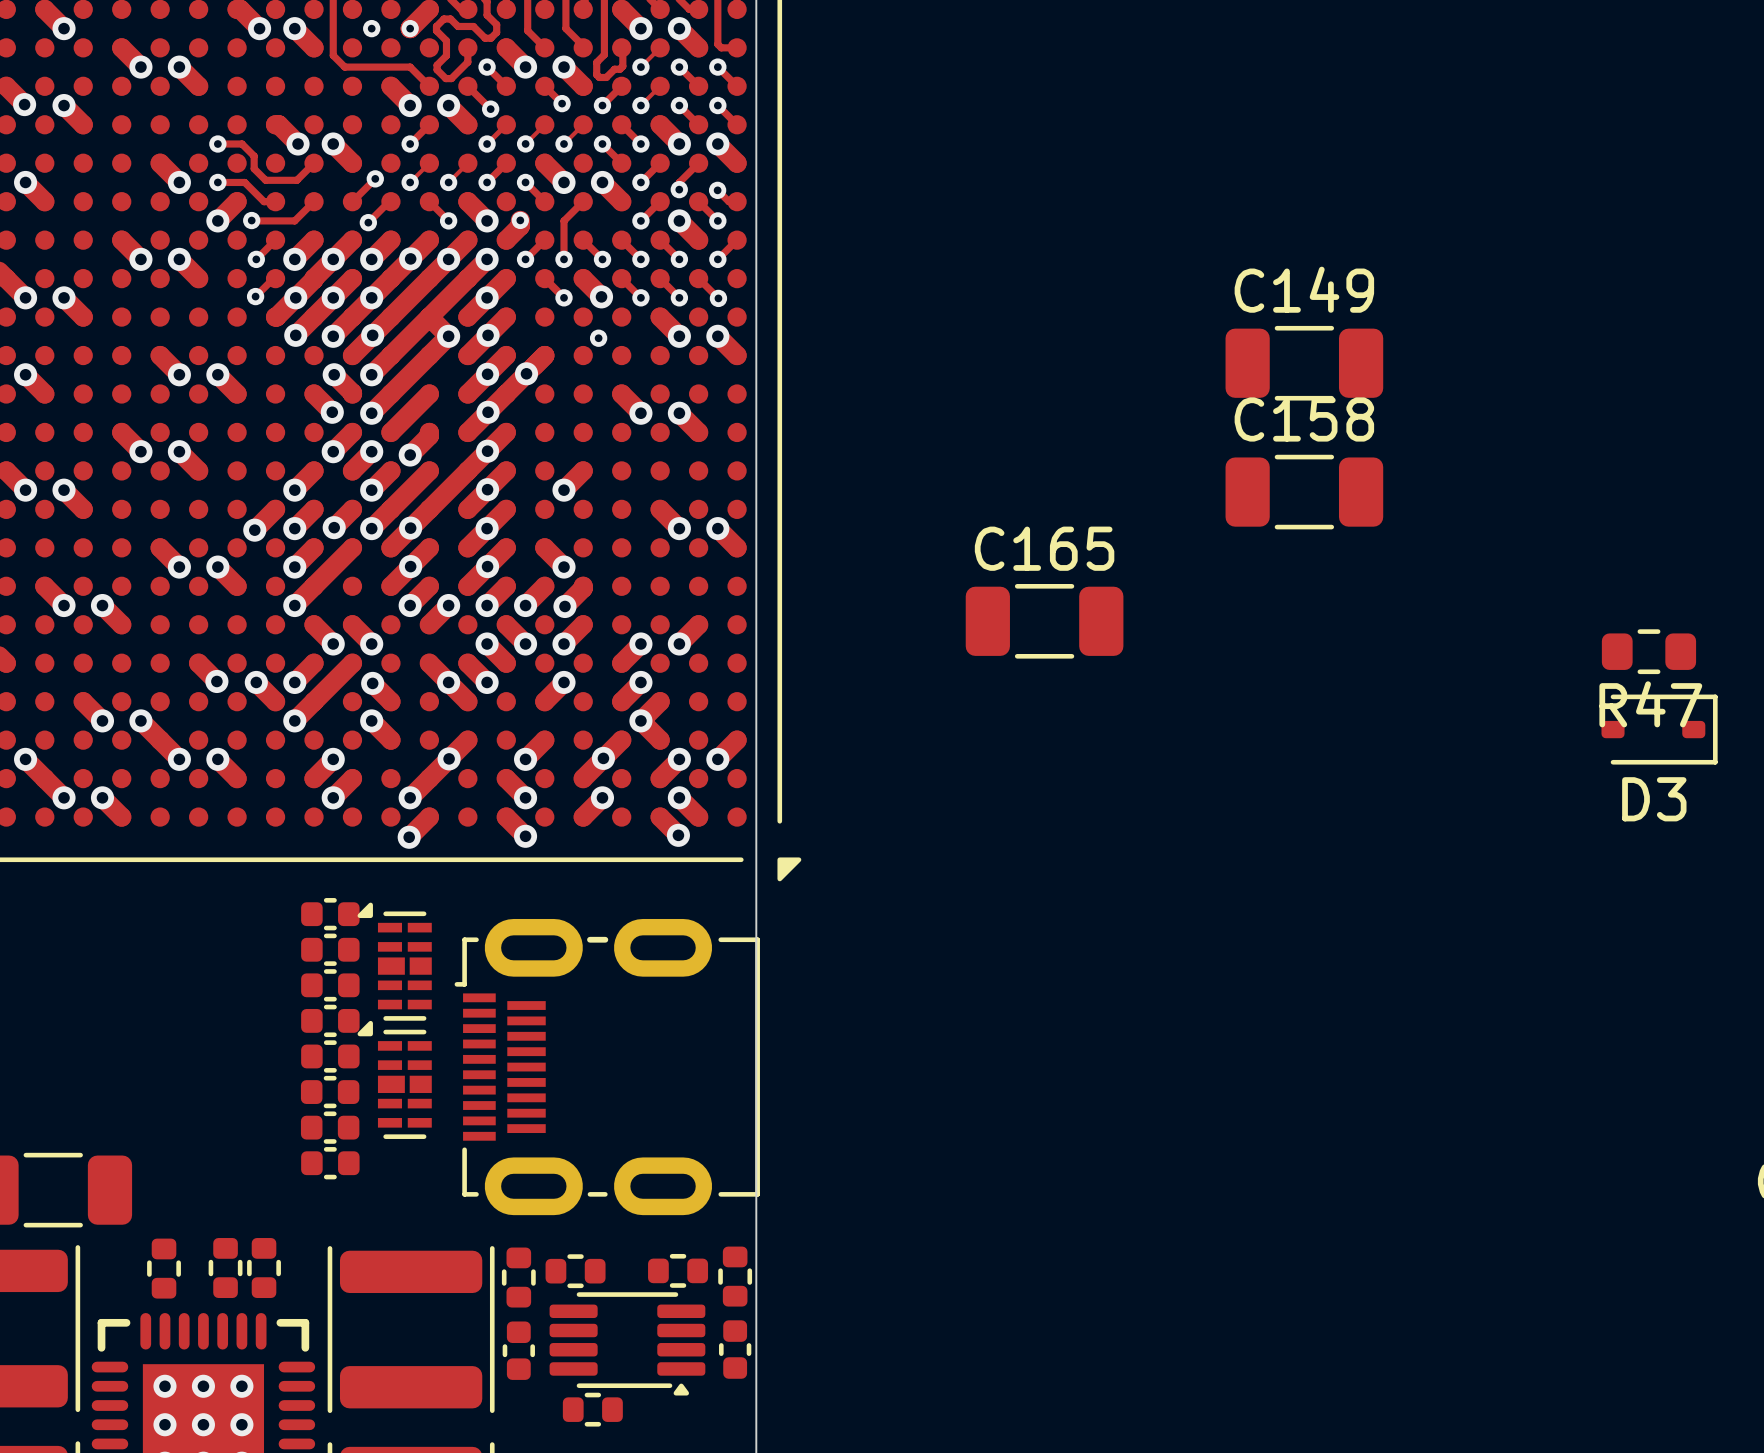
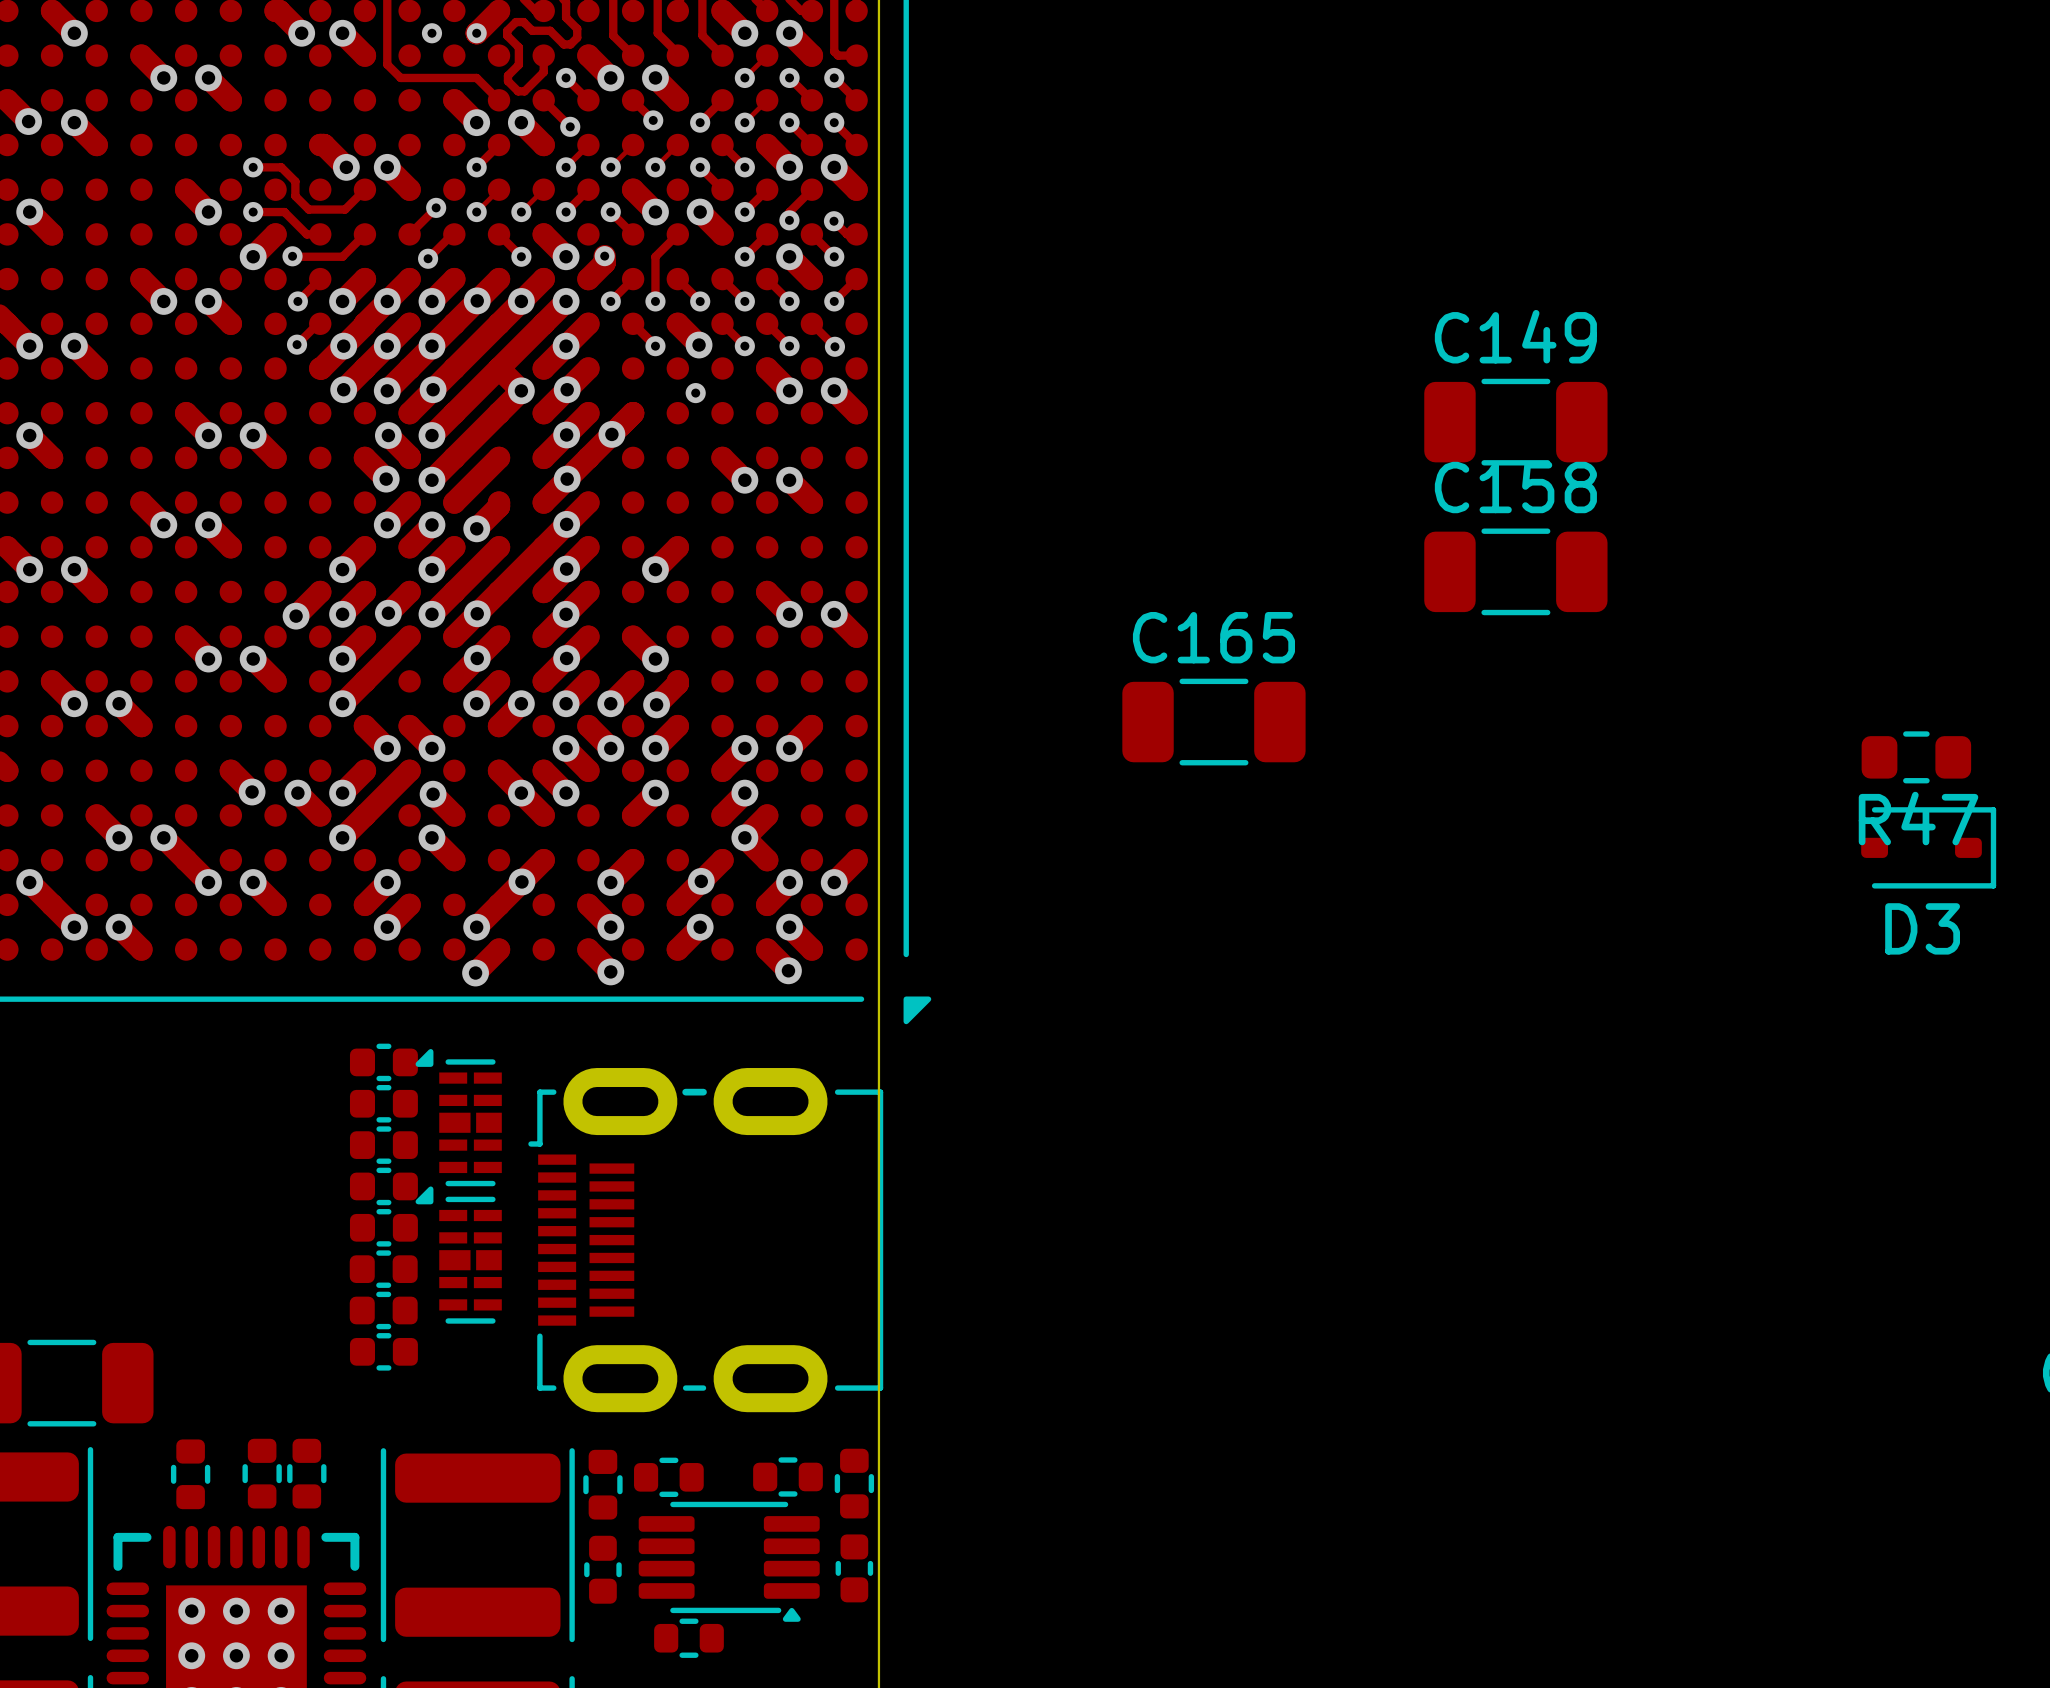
track: (604, 30) (604, 54) (596, 62) (596, 74) (599, 77) (606, 77) (614, 69) (619, 69) (622, 66) (621, 47) -> (702, 35) (722, 55)

